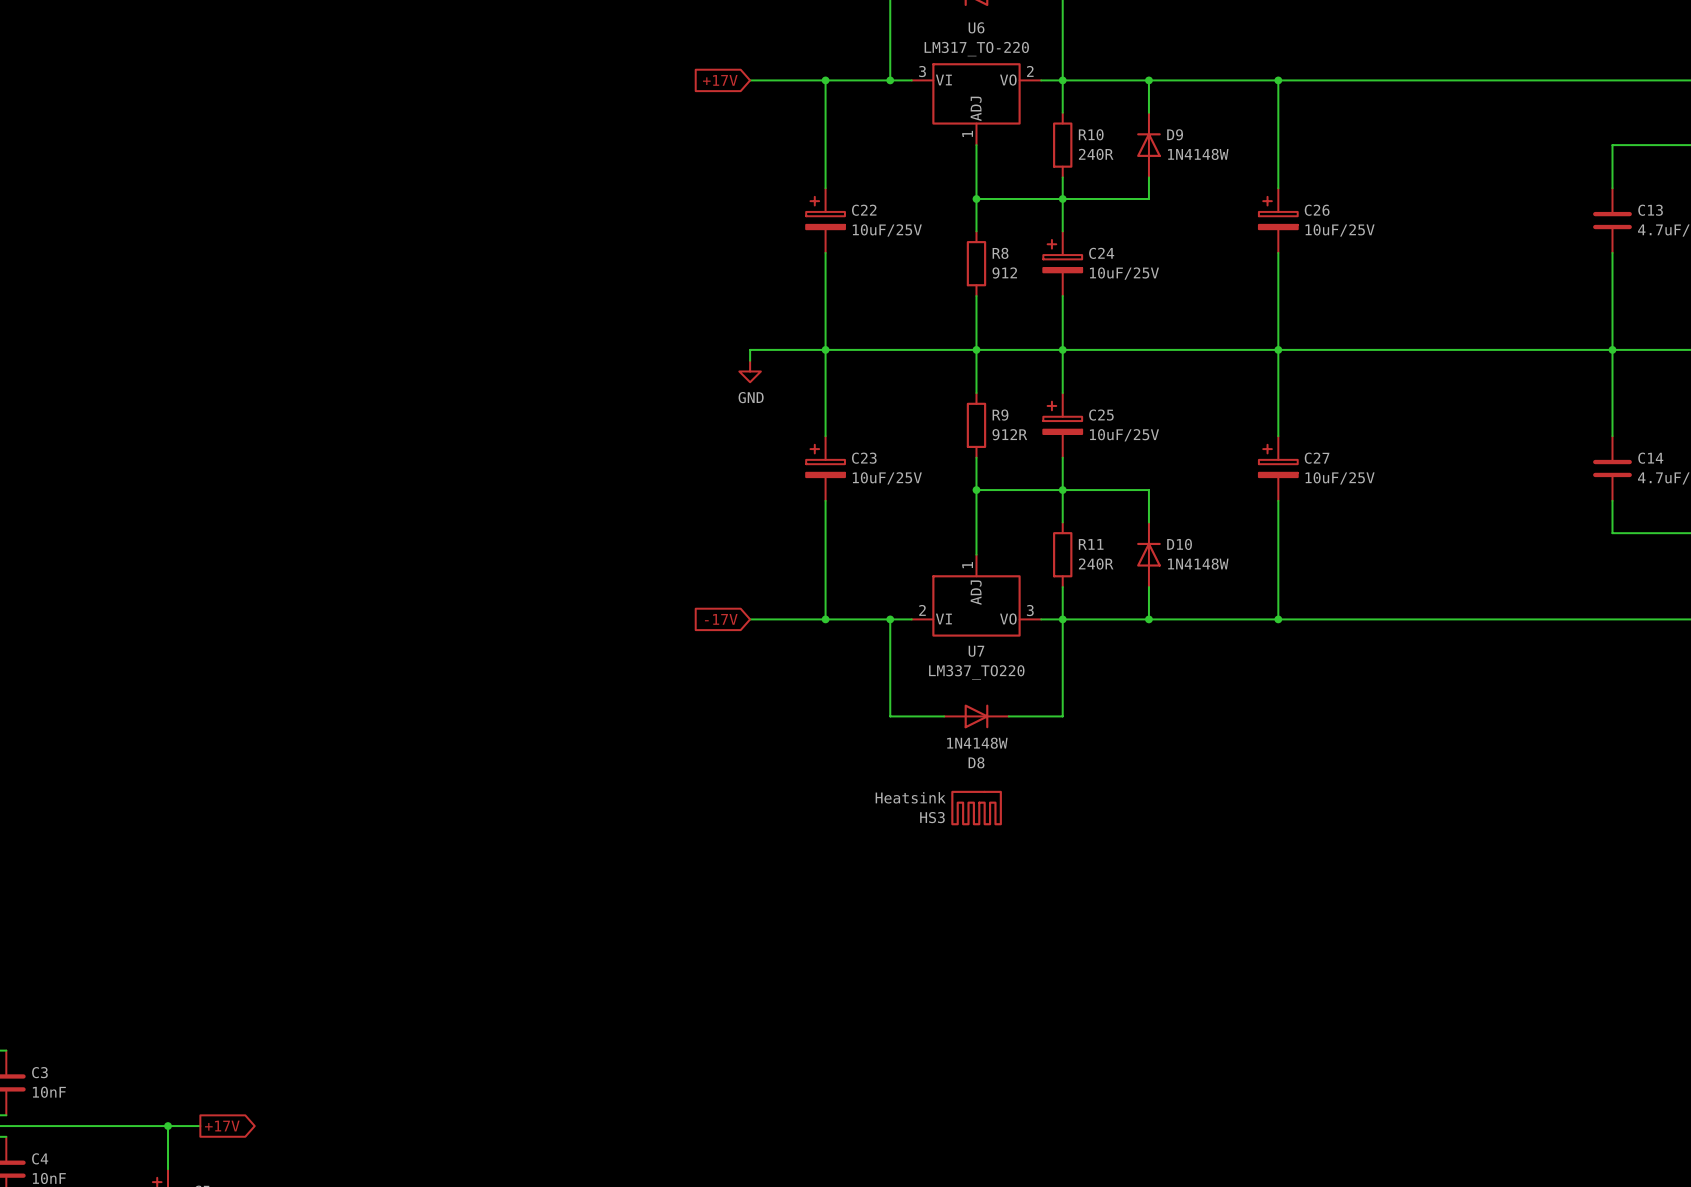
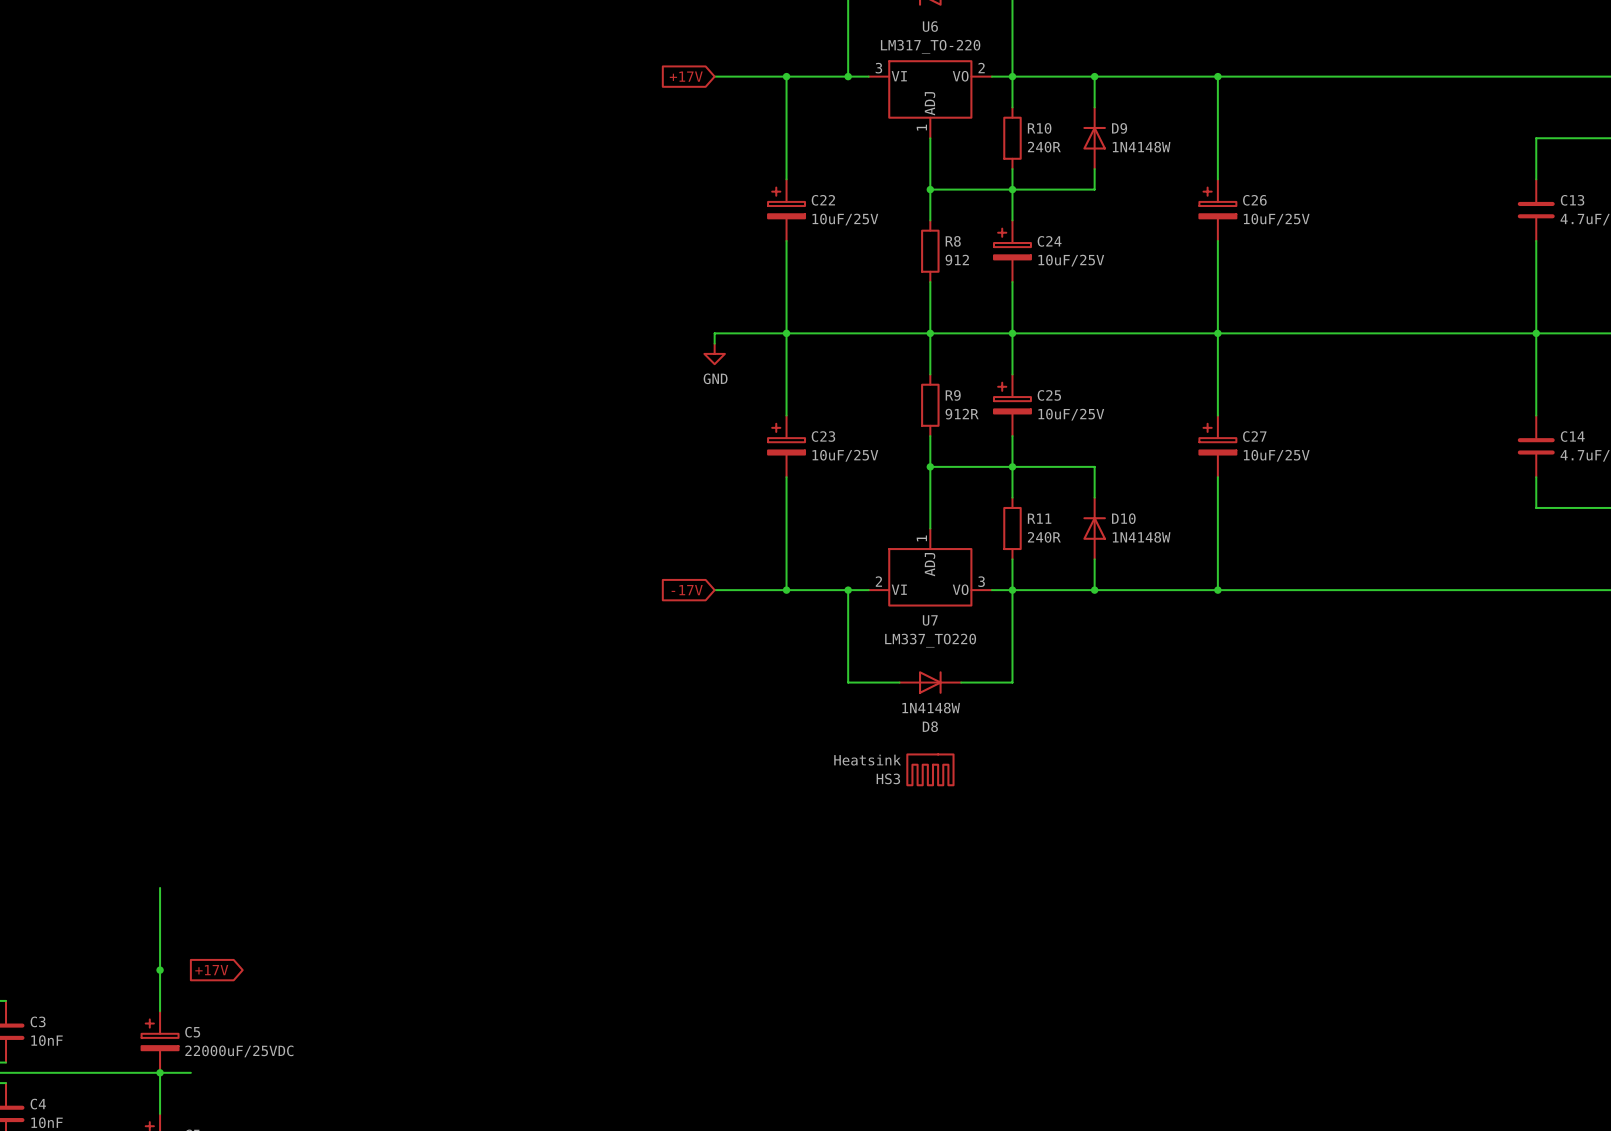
wire: none -> (160, 887) (160, 1011)
junction: none -> (160, 970)
C5: none -> 22000uF/25VDC (160, 1042)
global label position: +17V (222, 1126) -> +17V (211, 970)

